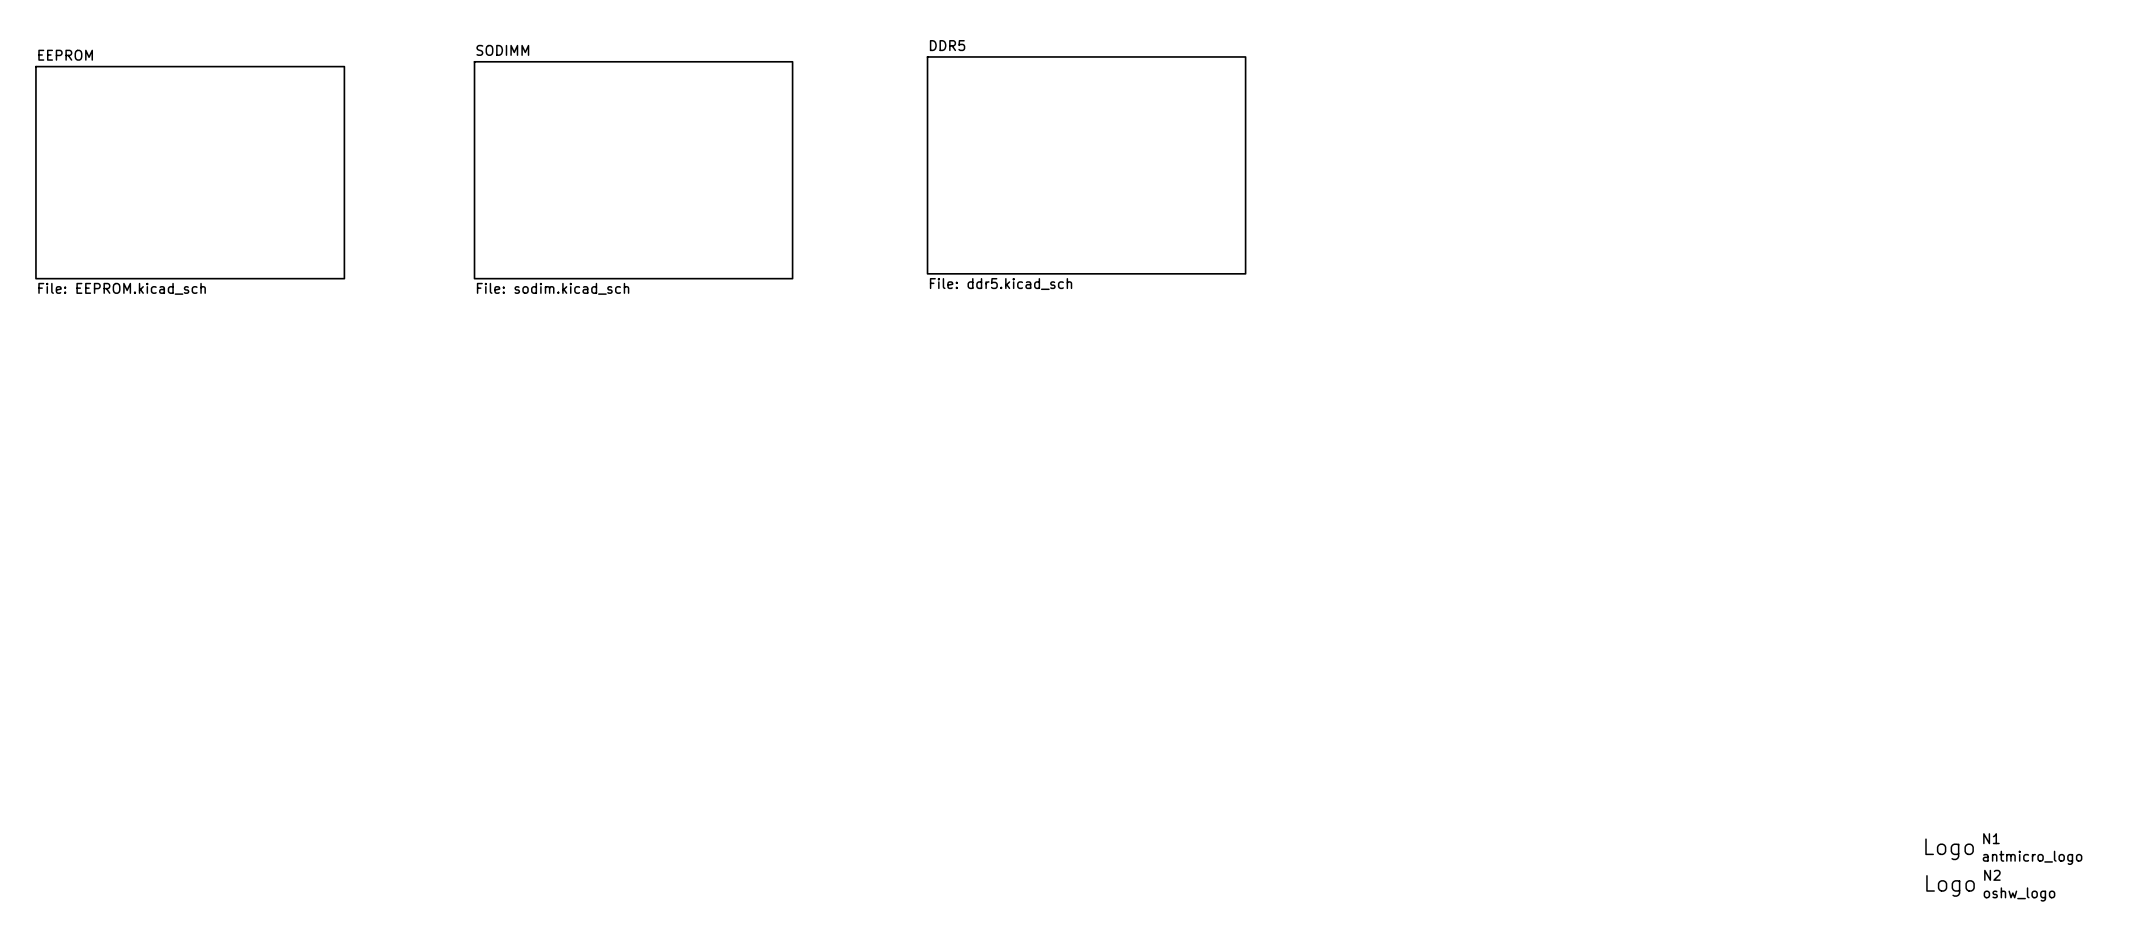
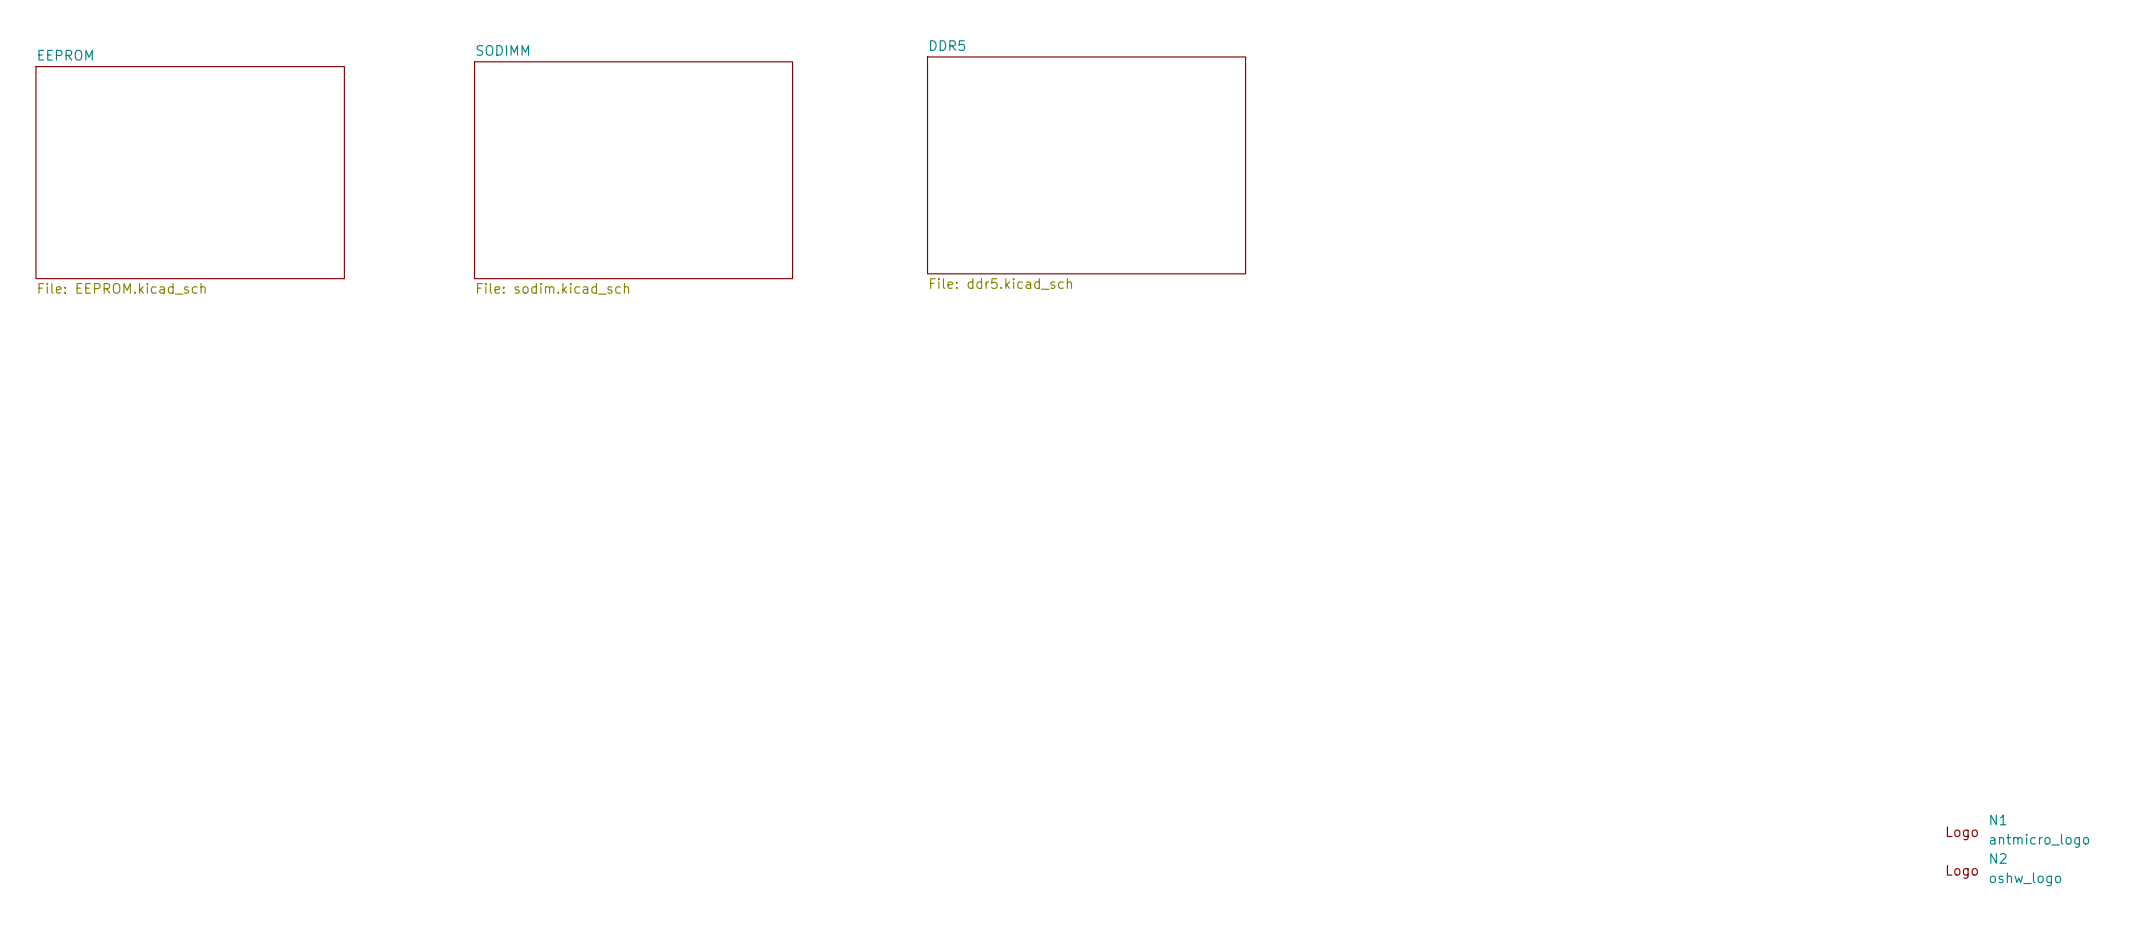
N1 symbol: [1925, 833, 2083, 865] -> [1946, 814, 2090, 848]
N2 symbol: [1926, 869, 2056, 902] -> [1946, 853, 2062, 887]

